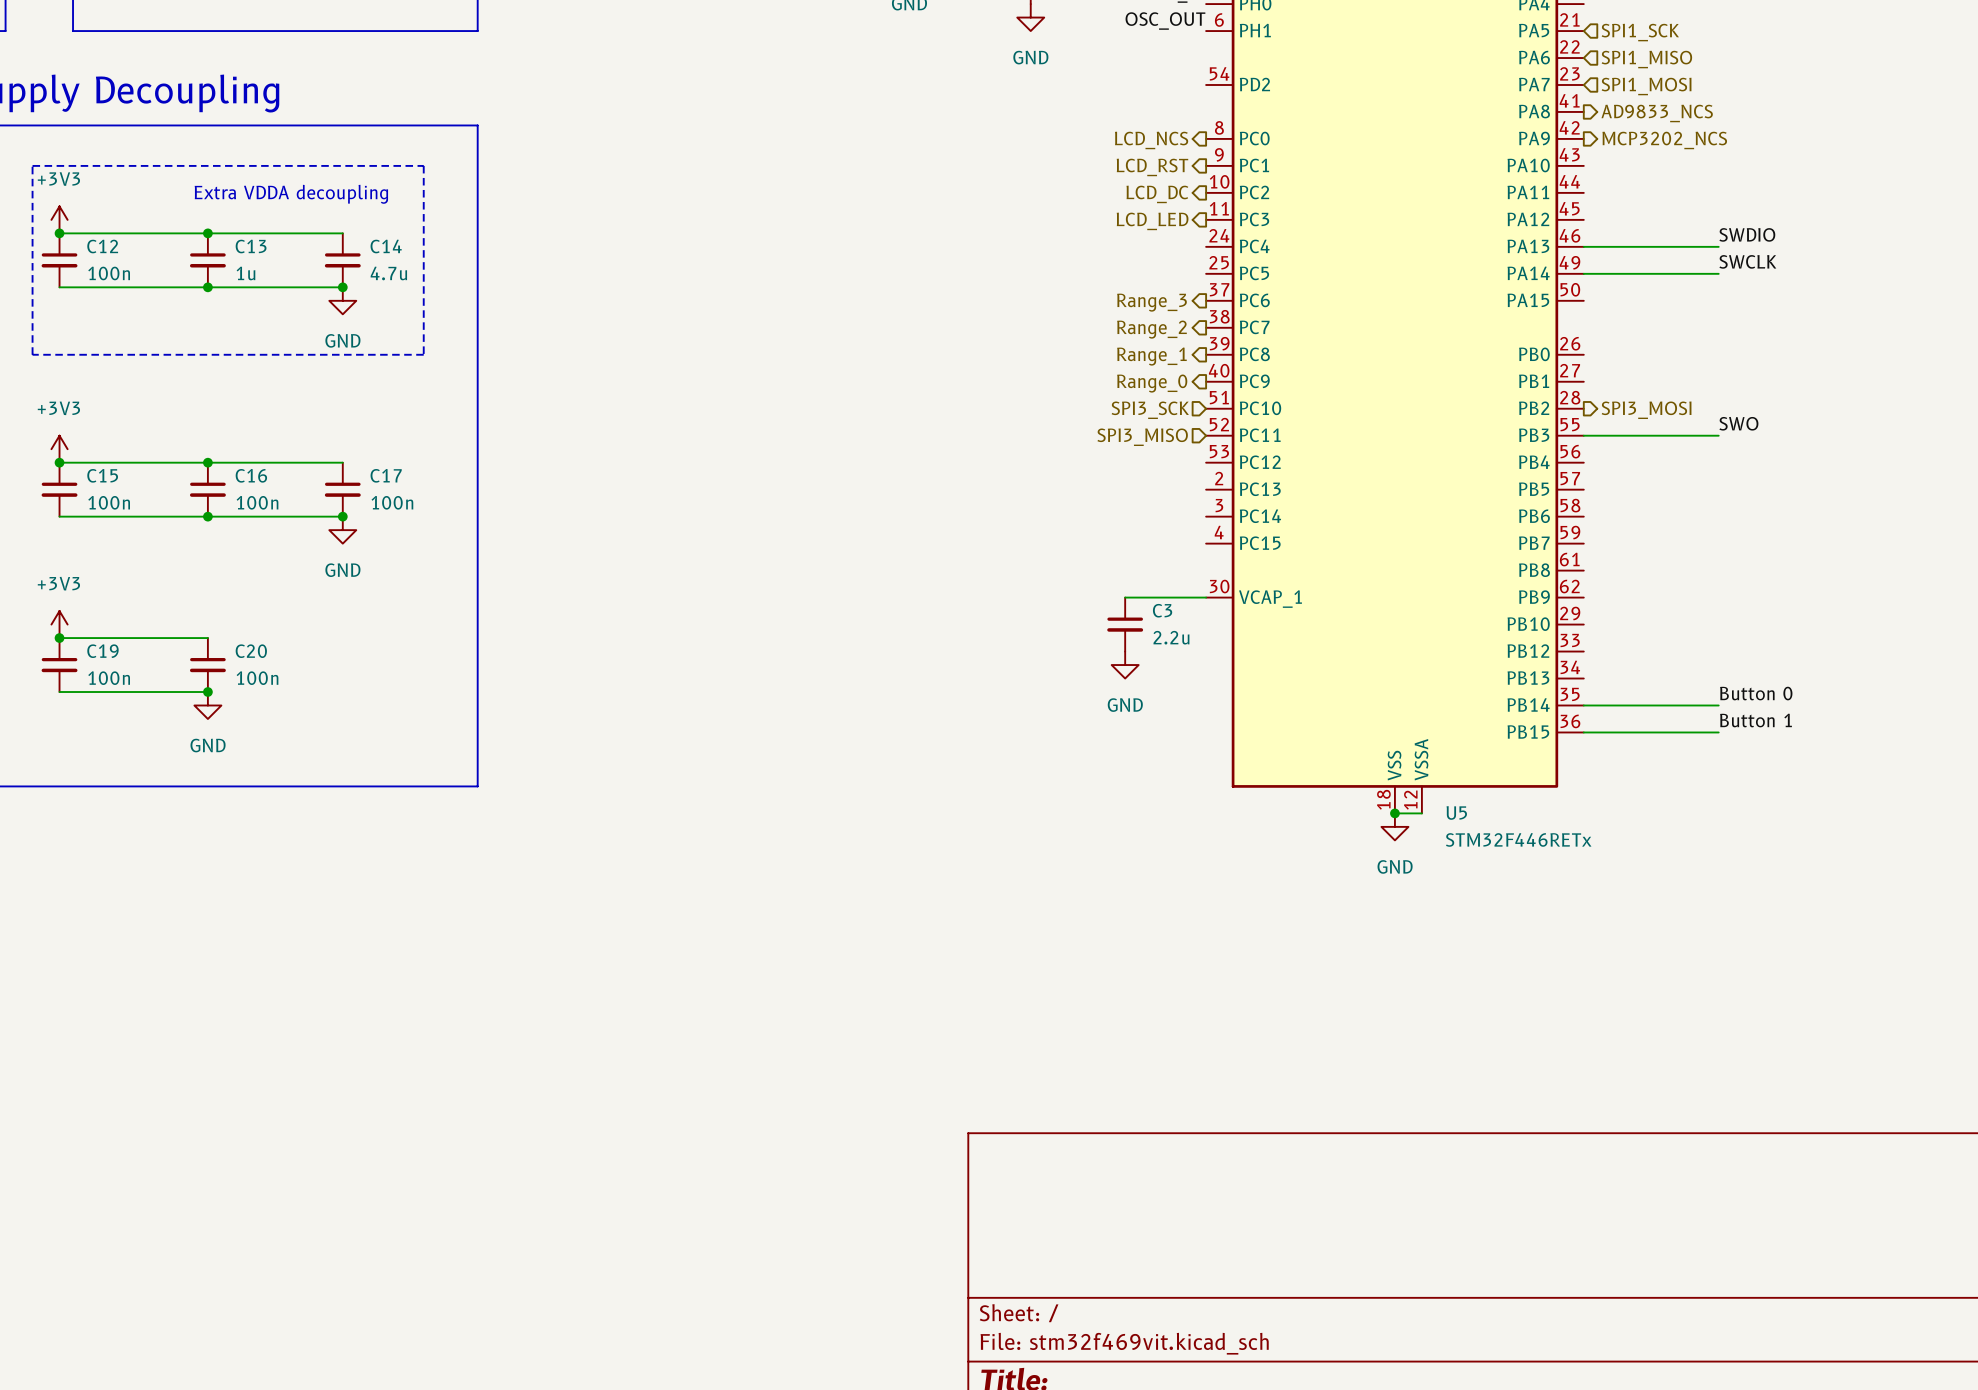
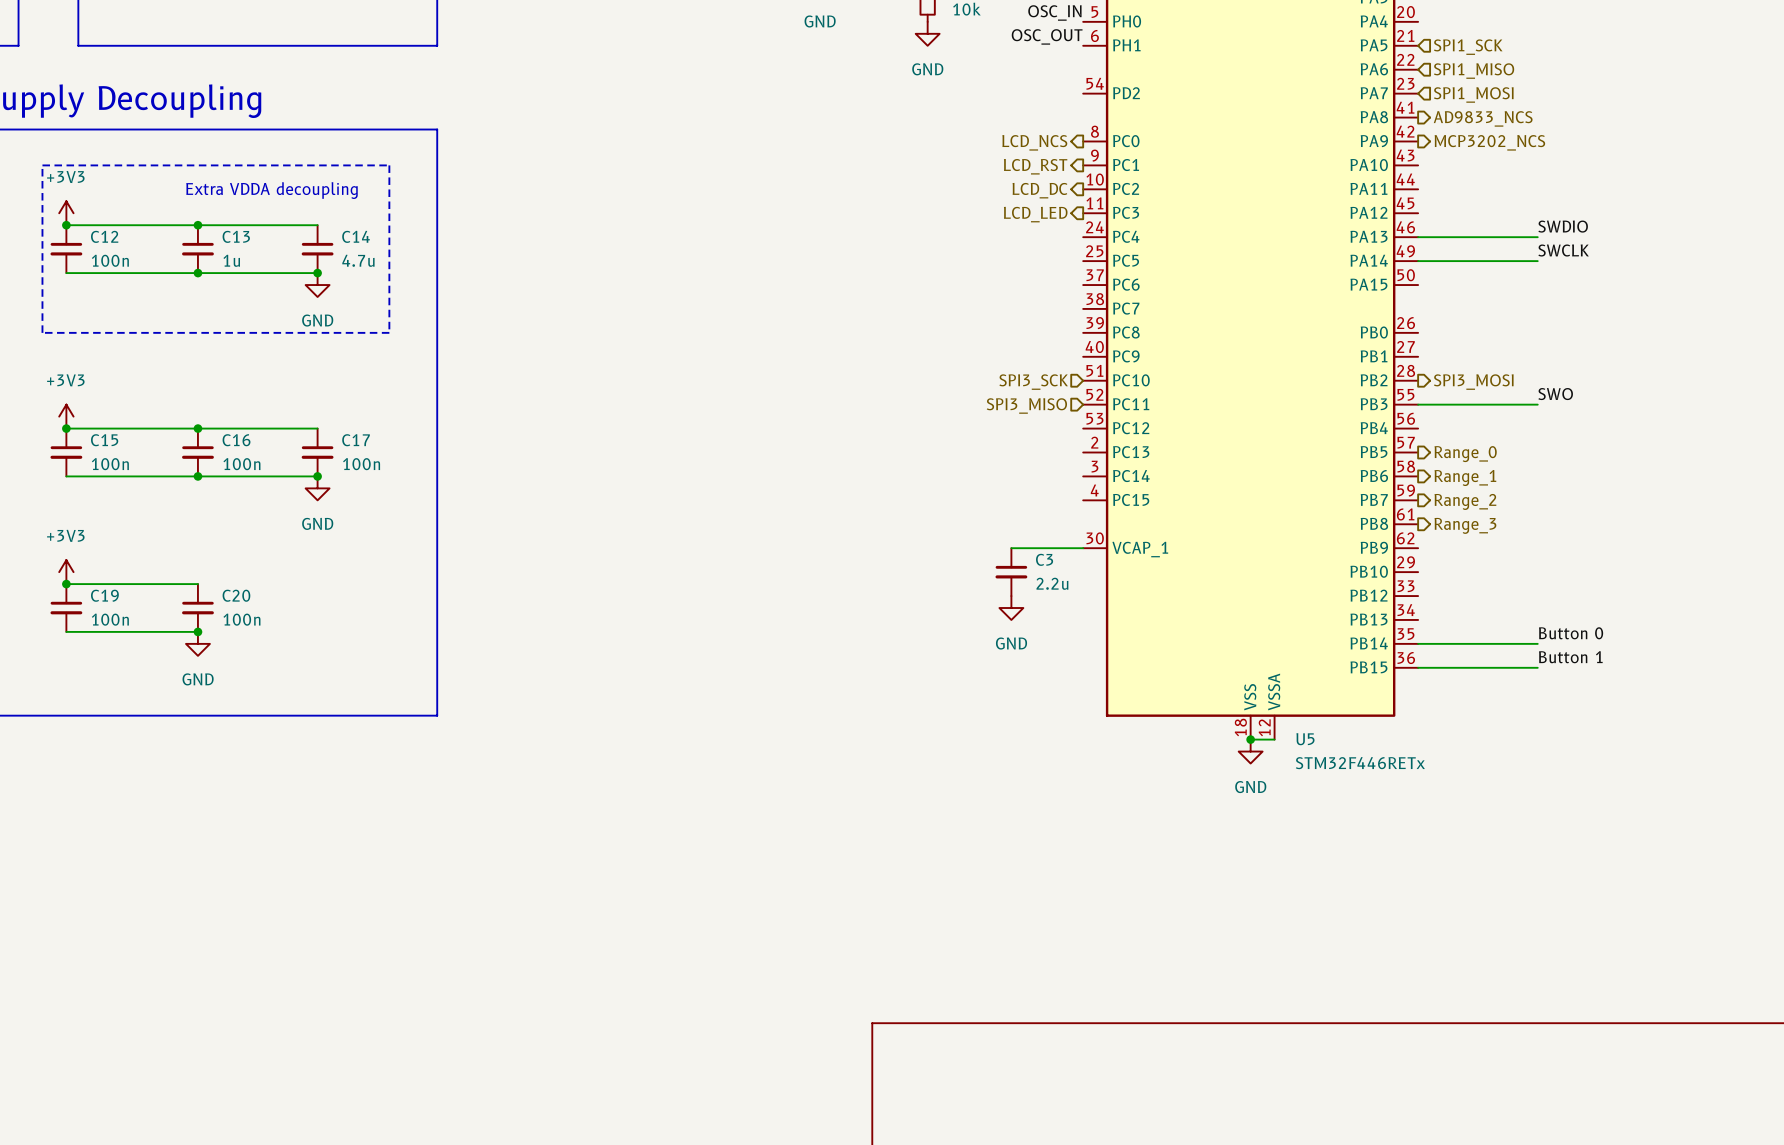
hierarchical label: Range_3 (1151, 302) -> none
hierarchical label: Range_2 (1151, 329) -> none
hierarchical label: Range_1 (1151, 356) -> none
hierarchical label: Range_0 (1152, 383) -> none
hierarchical label: none -> Range_0 (1465, 454)
hierarchical label: none -> Range_1 (1465, 478)
hierarchical label: none -> Range_2 (1465, 501)
hierarchical label: none -> Range_3 (1465, 525)

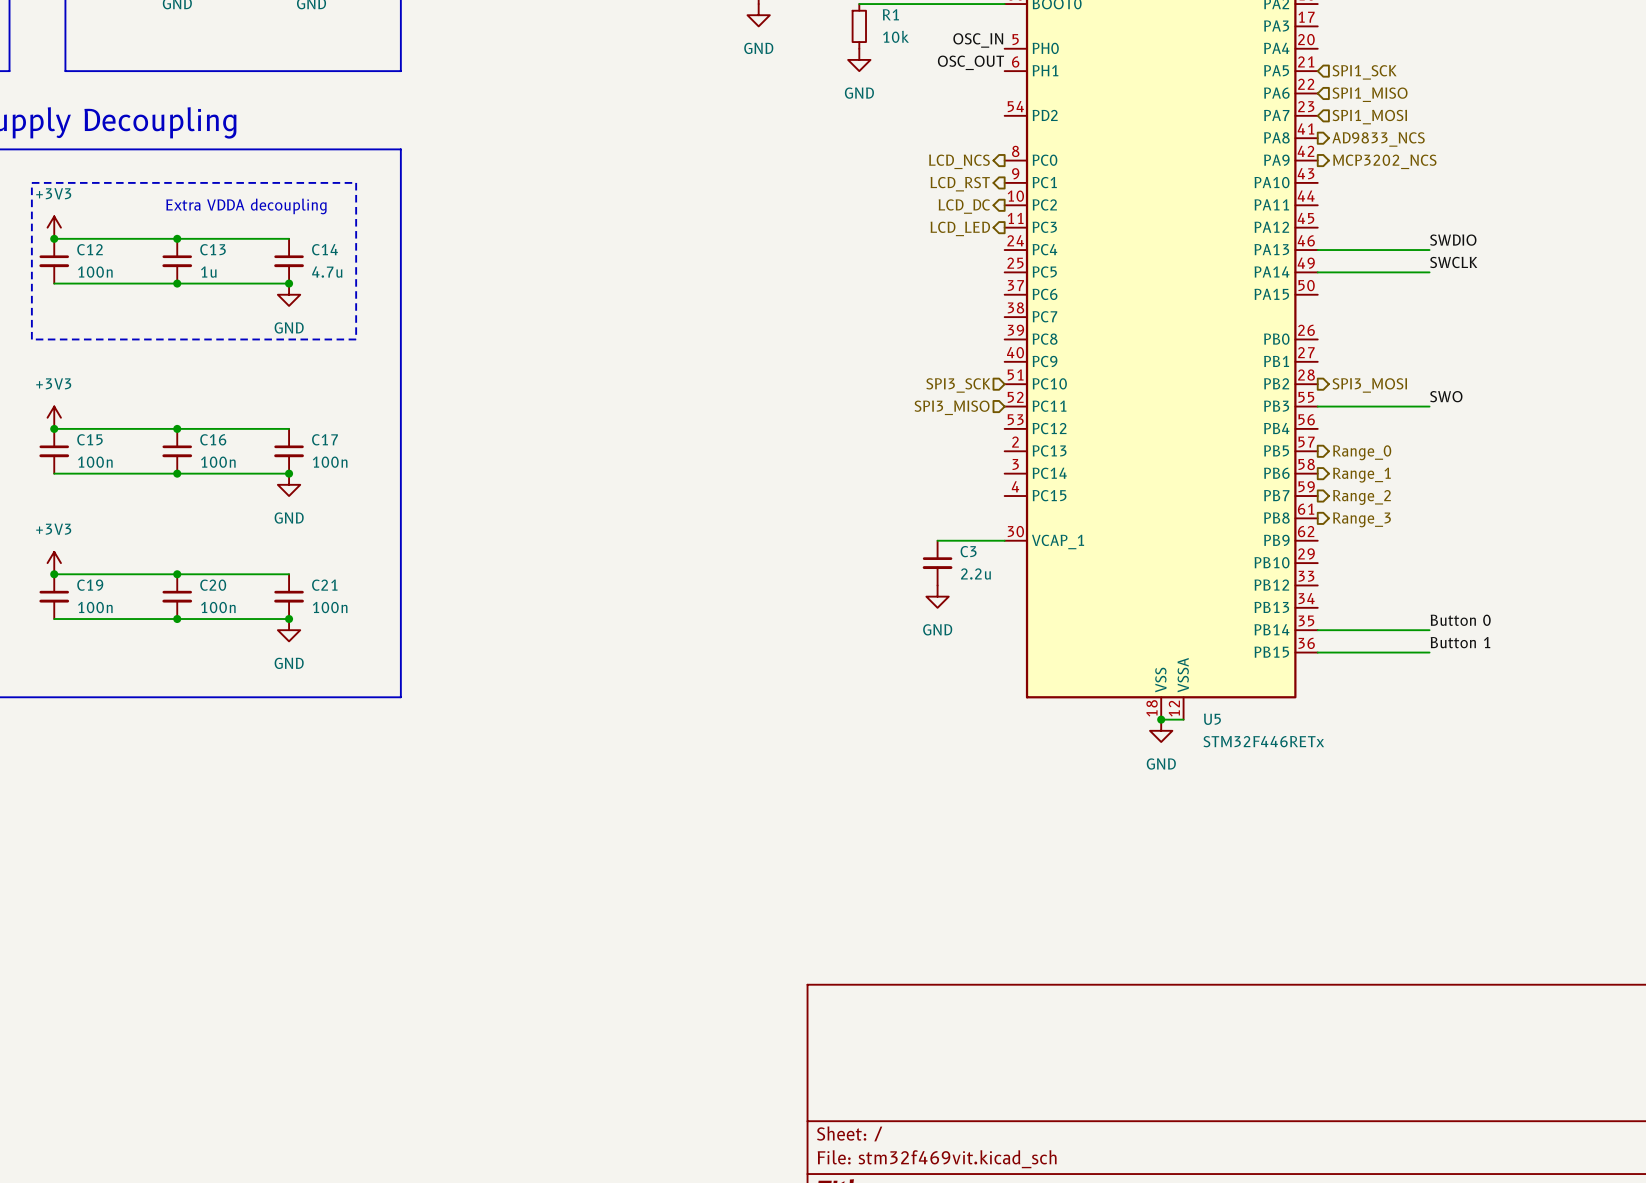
wire: none -> (177, 574) (289, 574)
junction: none -> (177, 574)
C21: none -> 100n (289, 596)
wire: none -> (177, 619) (289, 619)
junction: none -> (289, 619)
power symbol position: GND (197, 643) -> GND (289, 630)

